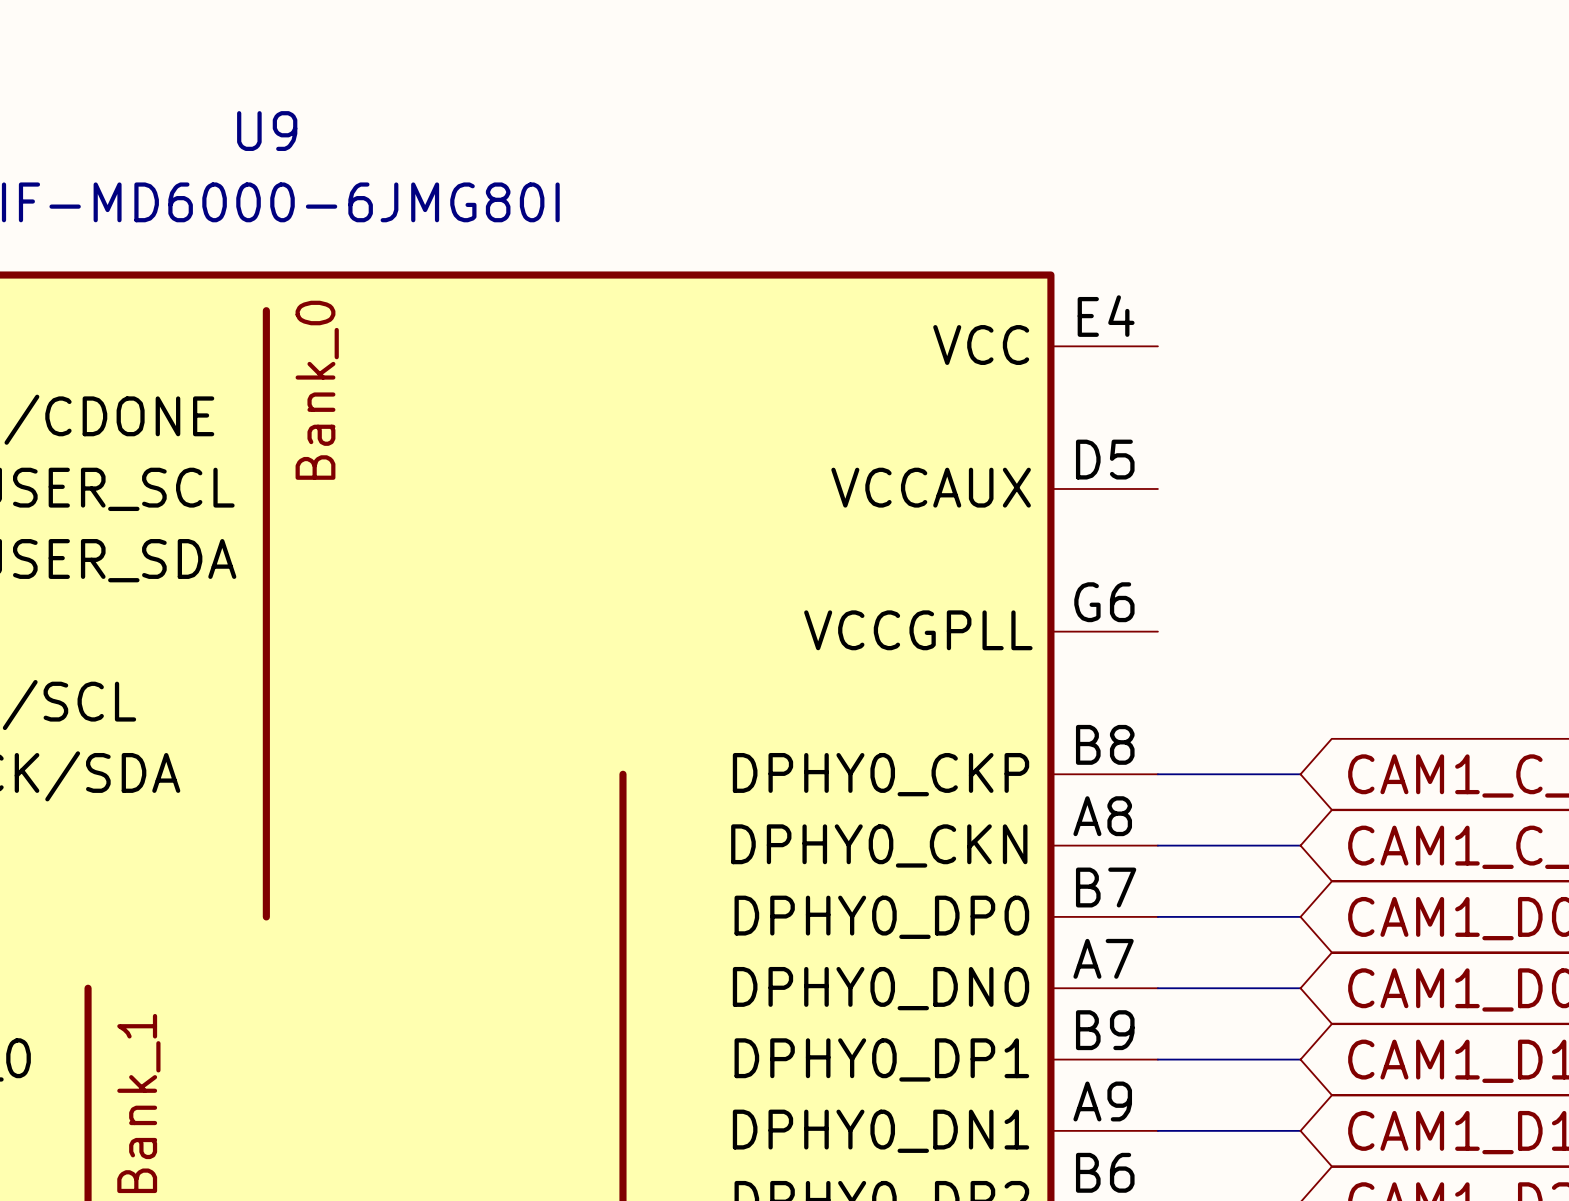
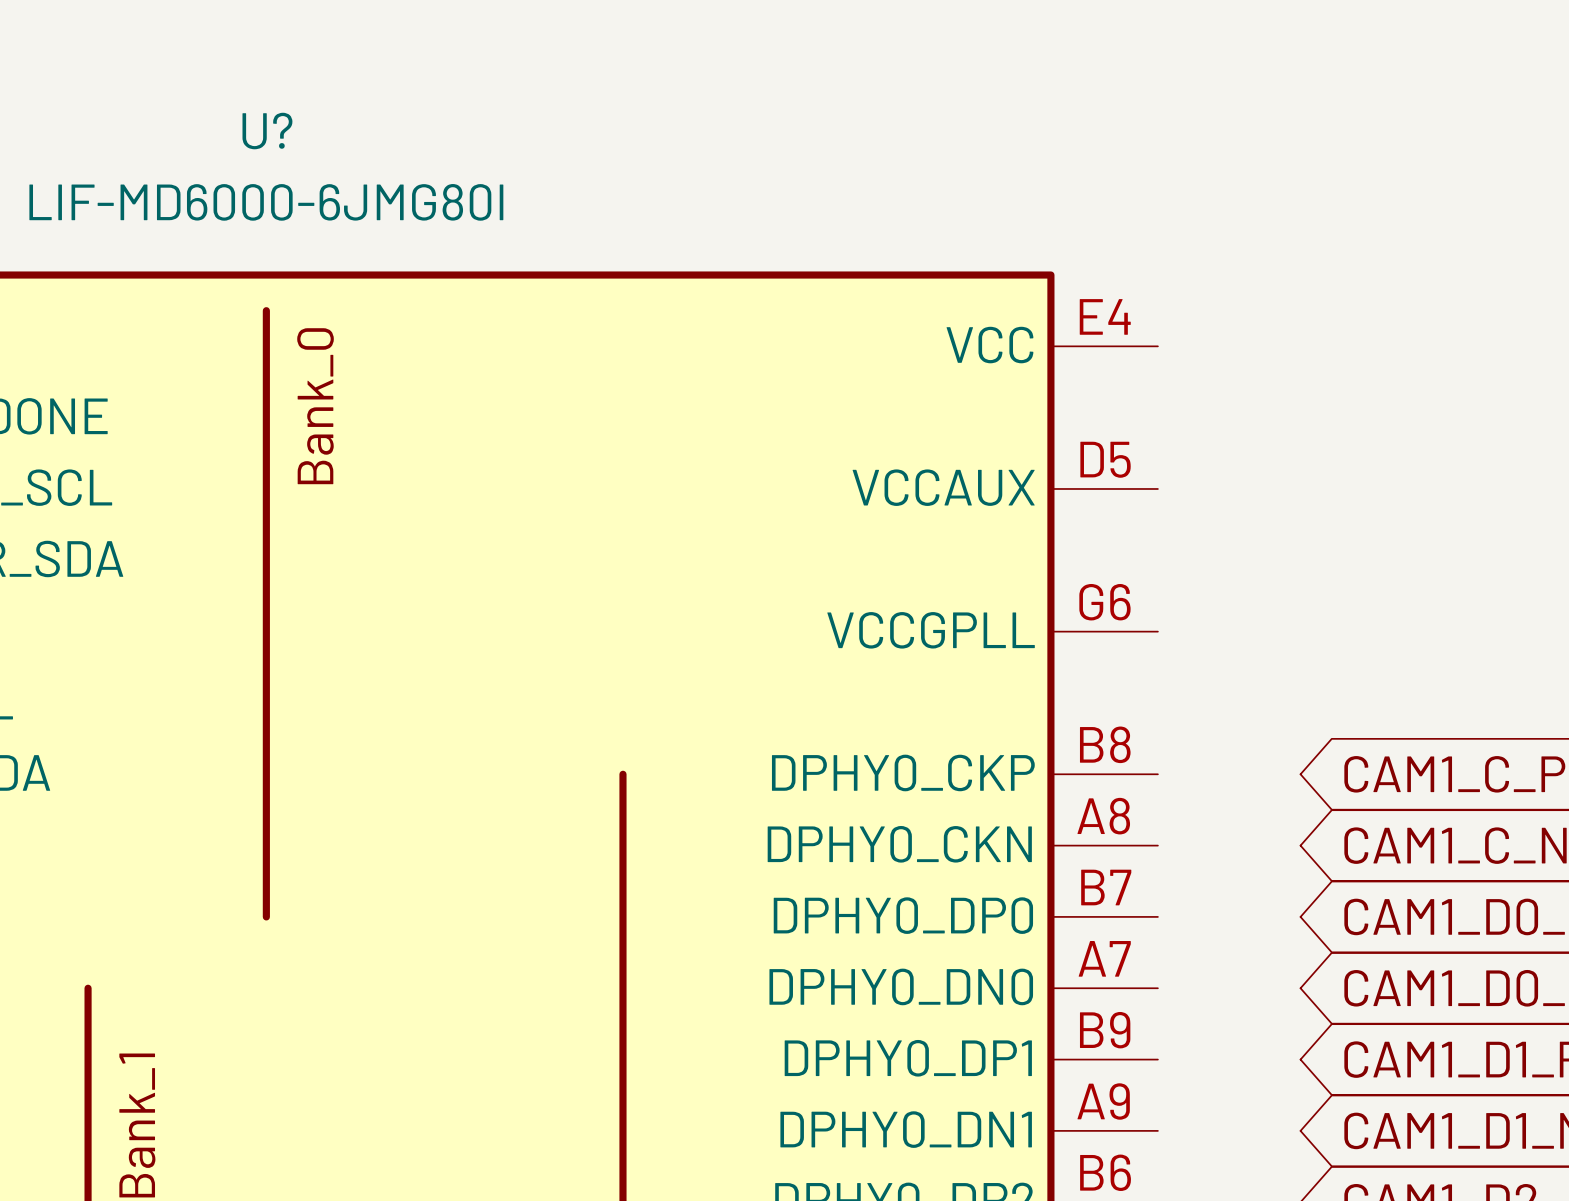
U9 name: U9 (267, 131) -> U? (267, 131)
wire: (1157, 774) (1300, 774) -> none
wire: (1157, 845) (1300, 845) -> none
wire: (1157, 916) (1300, 916) -> none
wire: (1157, 988) (1300, 988) -> none
wire: (1157, 1059) (1300, 1059) -> none
wire: (1157, 1130) (1300, 1130) -> none

